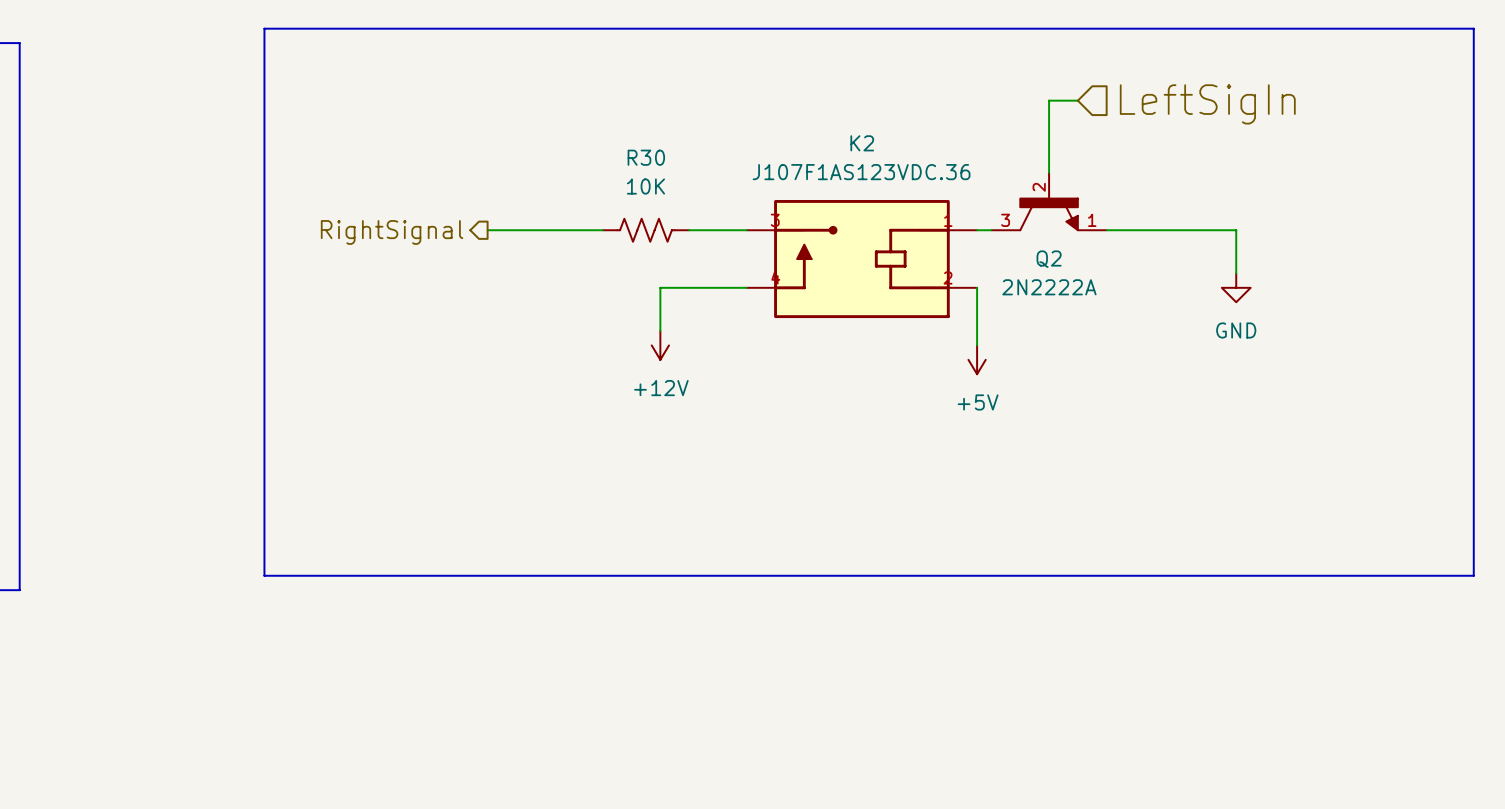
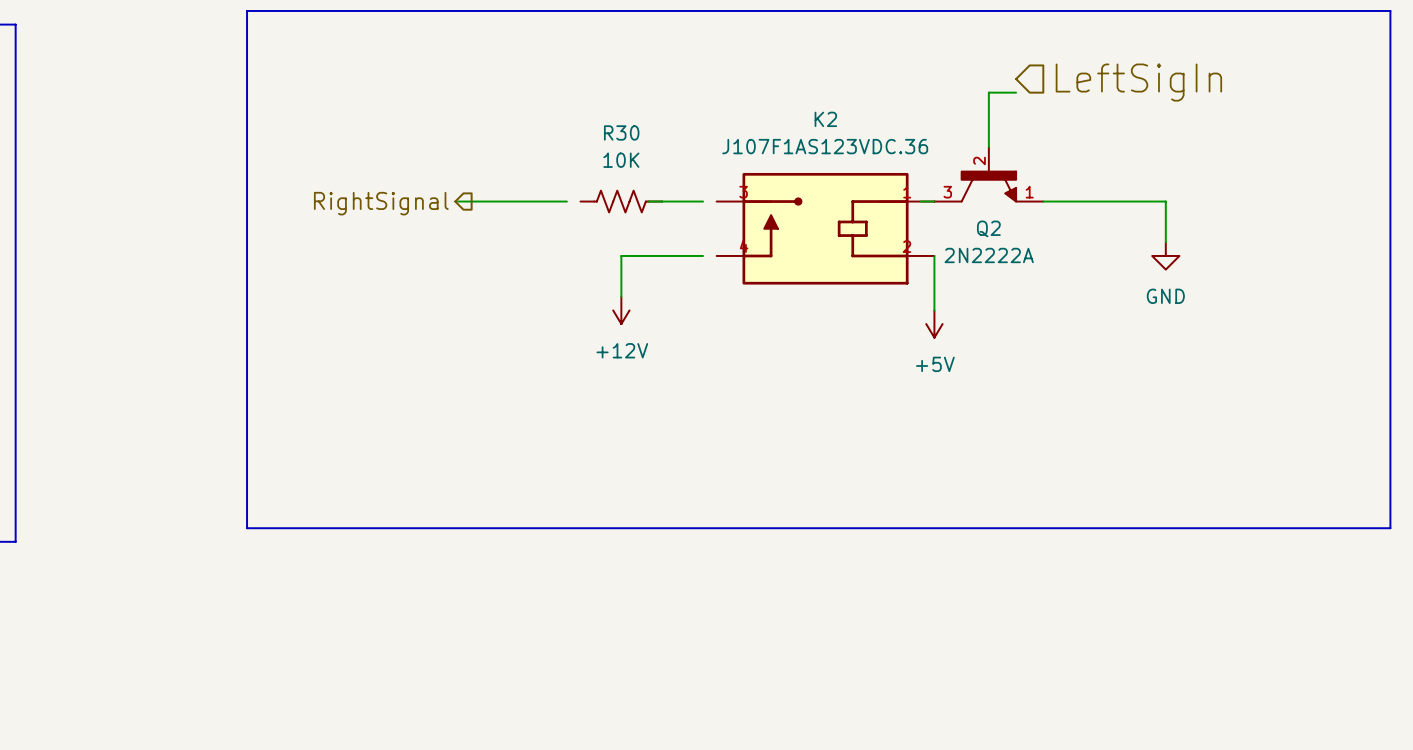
wire: (1077, 100) (1049, 100) (1049, 115) -> (1016, 92) (988, 92)
R30 position: (645, 230) -> (621, 201)
hierarchical label position: RightSignal (392, 232) -> RightSignal (381, 203)
K2 position: (861, 259) -> (825, 228)
wire: (977, 287) (977, 345) -> (934, 255) (934, 310)
power symbol position: +5V (977, 359) -> +5V (934, 324)

